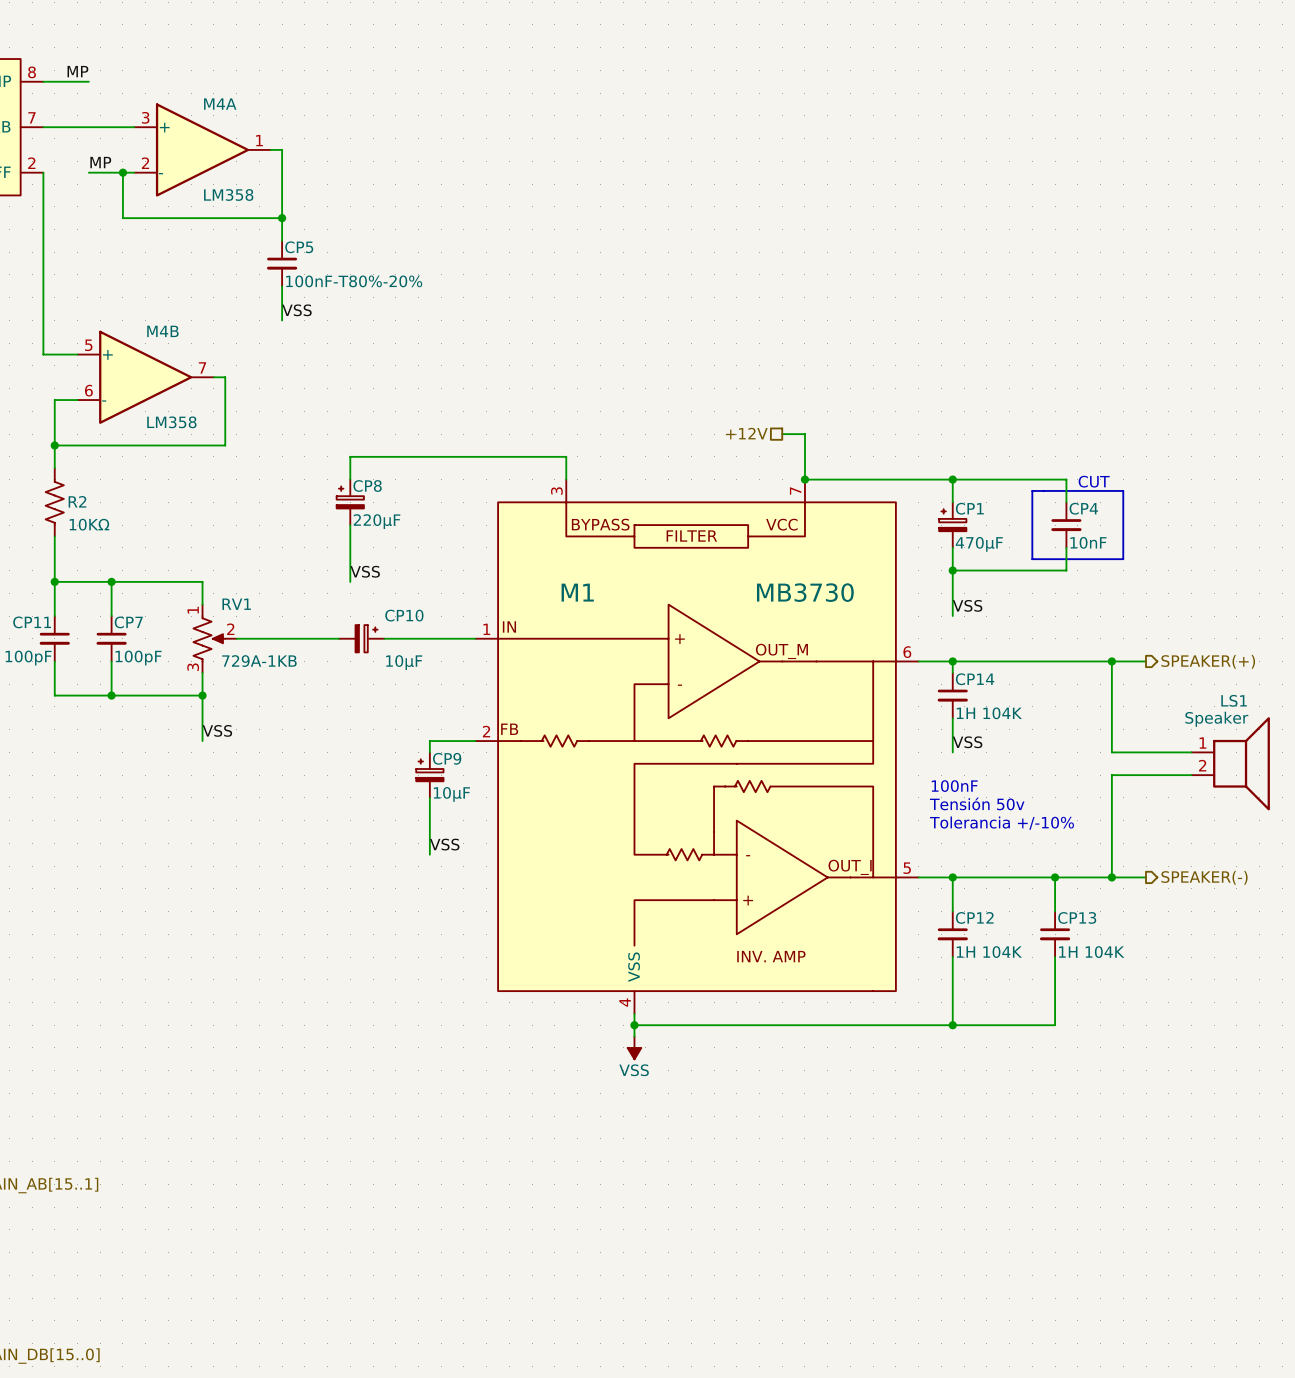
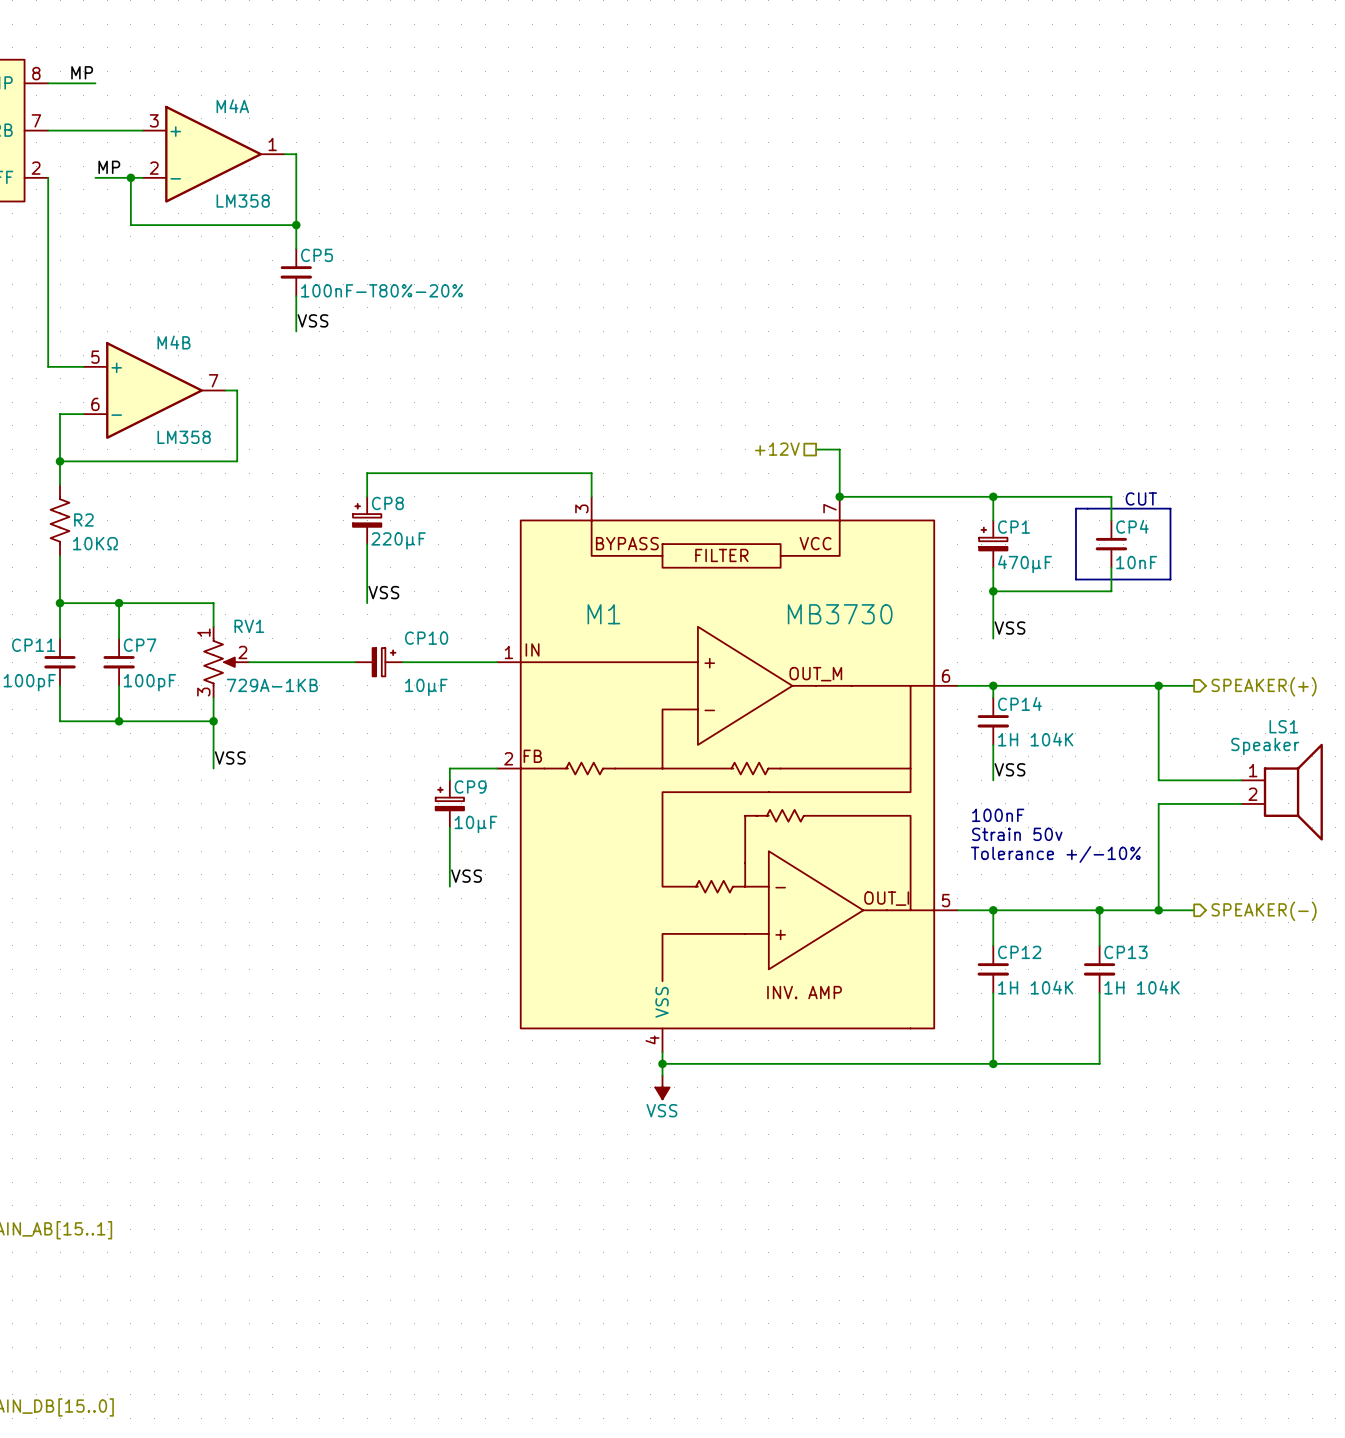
text: Tensión 50v (977, 803) -> Strain 50v (1017, 834)
text: Tolerancia +/-10% (1001, 823) -> Tolerance +/-10% (1055, 854)

